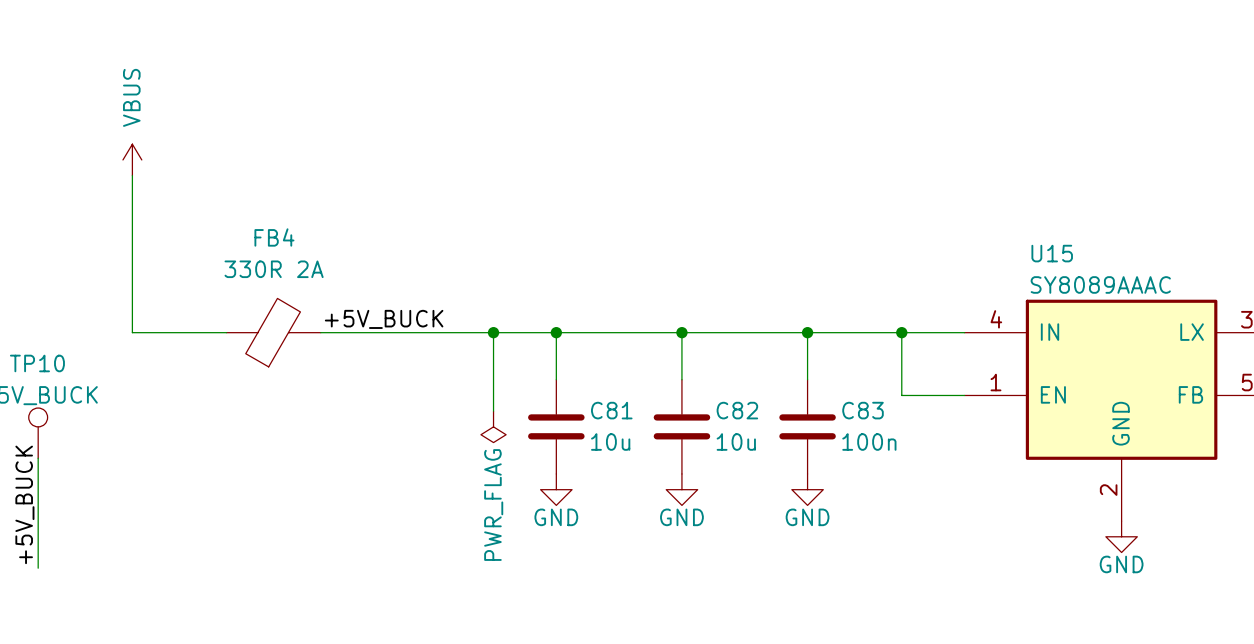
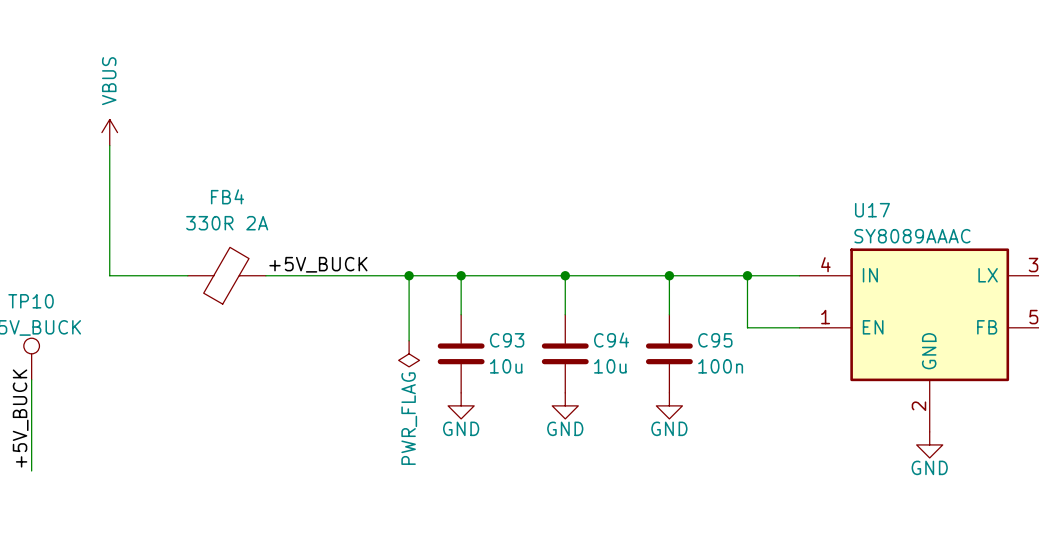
U15 name: U15 (1052, 253) -> U17 (872, 210)
C81 name: C81 (611, 410) -> C93 (507, 340)
C82 name: C82 (737, 410) -> C94 (611, 340)
C83 name: C83 (863, 410) -> C95 (715, 340)

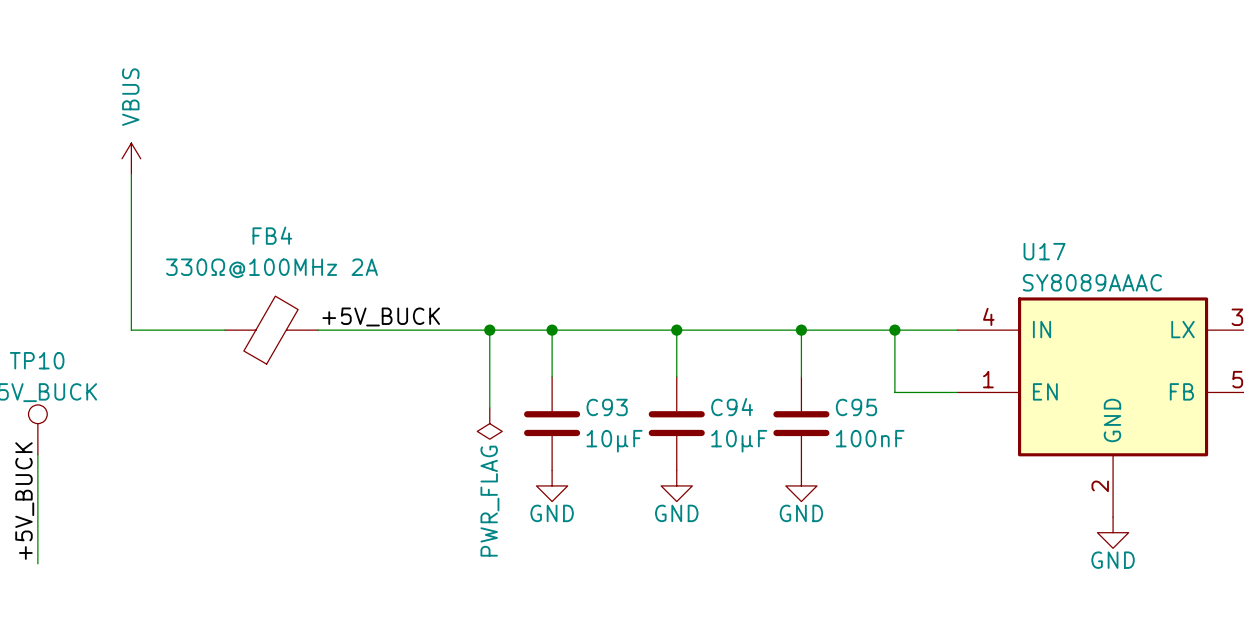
FB4 value: 330R 2A (227, 223) -> 330Ω@100MHz 2A (271, 268)
C93 value: 10u (506, 366) -> 10µF (614, 441)
C94 value: 10u (610, 366) -> 10µF (739, 441)
C95 value: 100n (720, 366) -> 100nF (870, 438)

